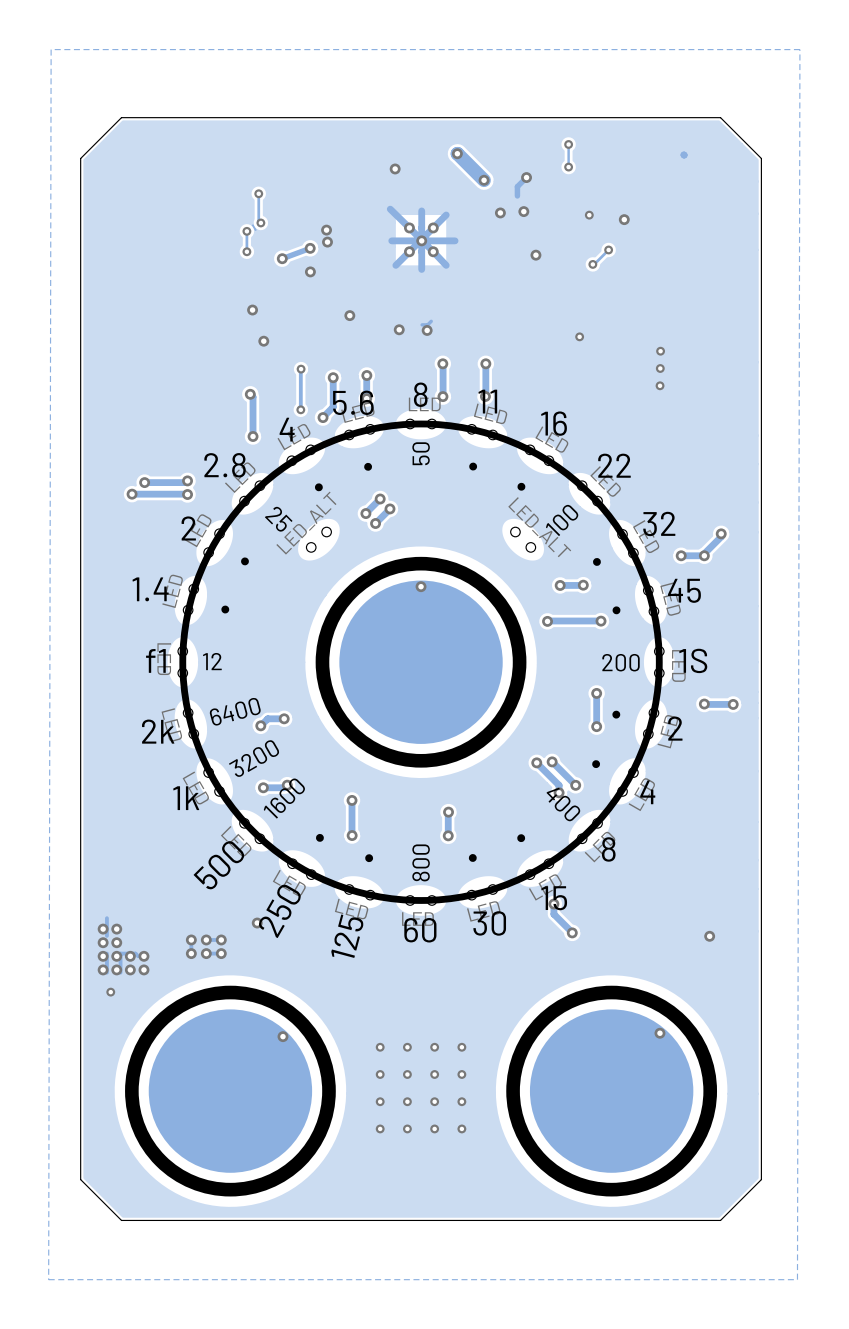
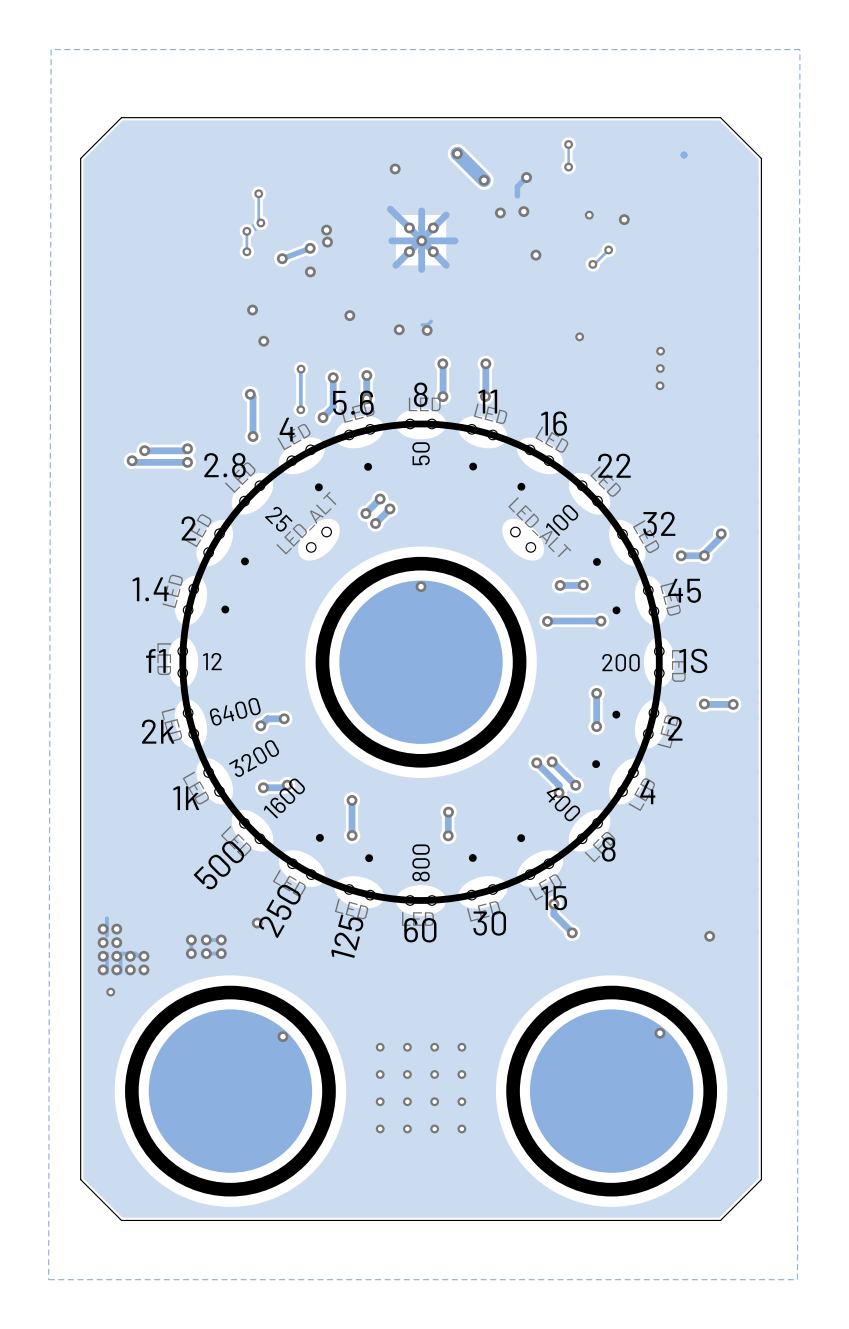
track: none -> (187, 448) (185, 450) (144, 450)
via: none -> (187, 448)
via: none -> (144, 450)
track: none -> (132, 460) (133, 462) (187, 462)
via: none -> (132, 460)
via: none -> (187, 462)
track: (187, 480) (185, 482) (144, 482) -> none
via: (187, 480) -> none
via: (144, 482) -> none
track: (132, 494) (187, 494) -> none
via: (132, 494) -> none
via: (187, 494) -> none

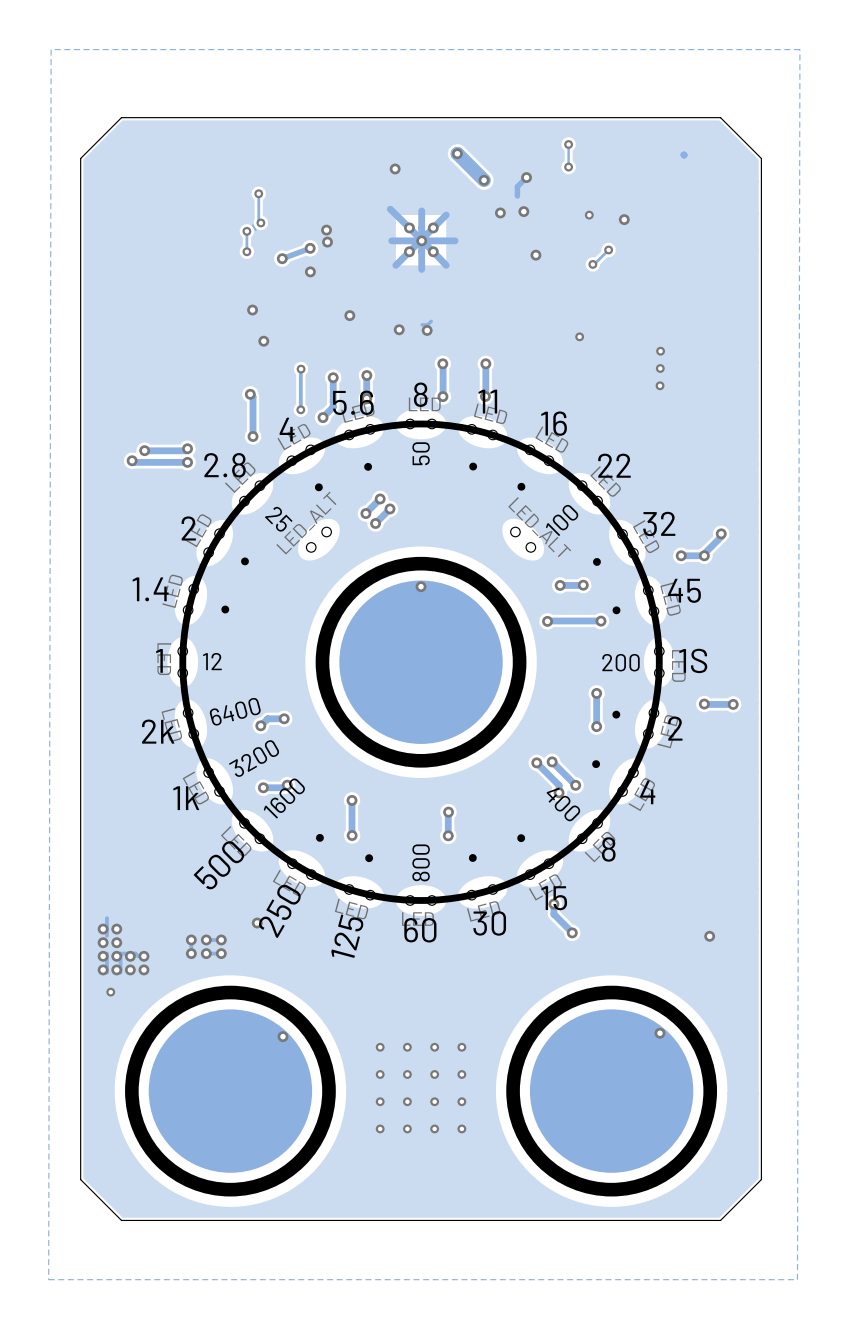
text: f1 (155, 660) -> 1 (159, 660)

